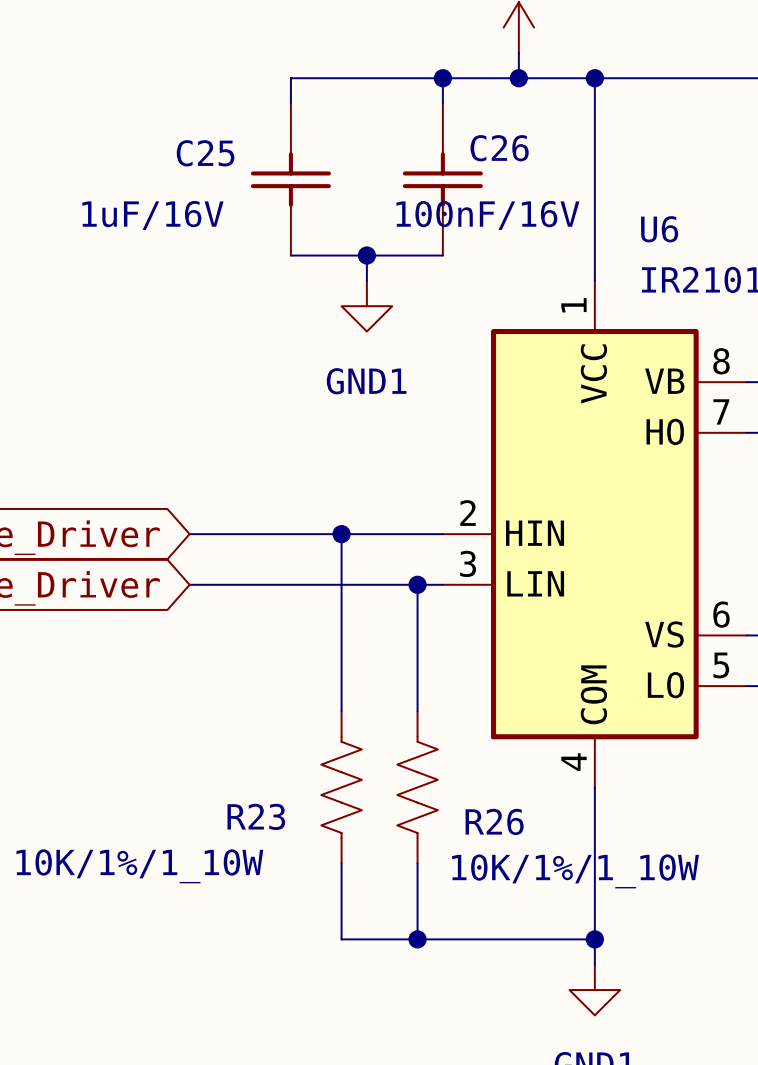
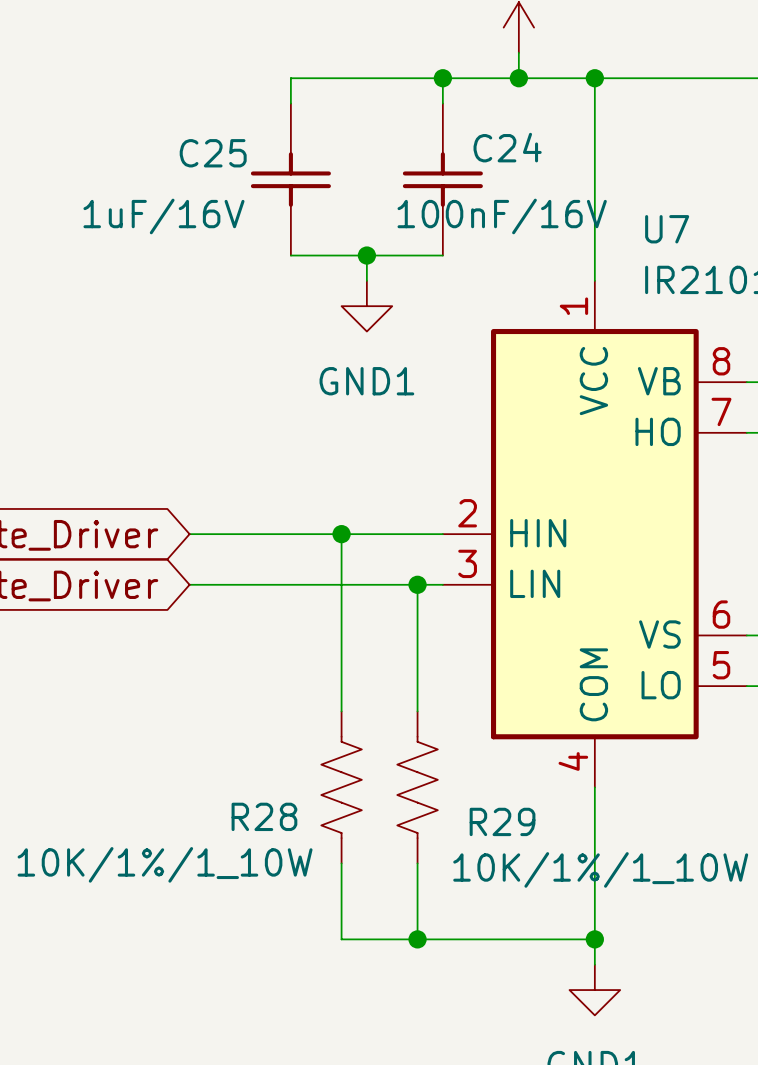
C26 name: C26 (499, 148) -> C24 (507, 147)
U6 name: U6 (659, 229) -> U7 (667, 229)
R23 name: R23 (256, 816) -> R28 (264, 816)
R26 name: R26 (494, 821) -> R29 (502, 821)

